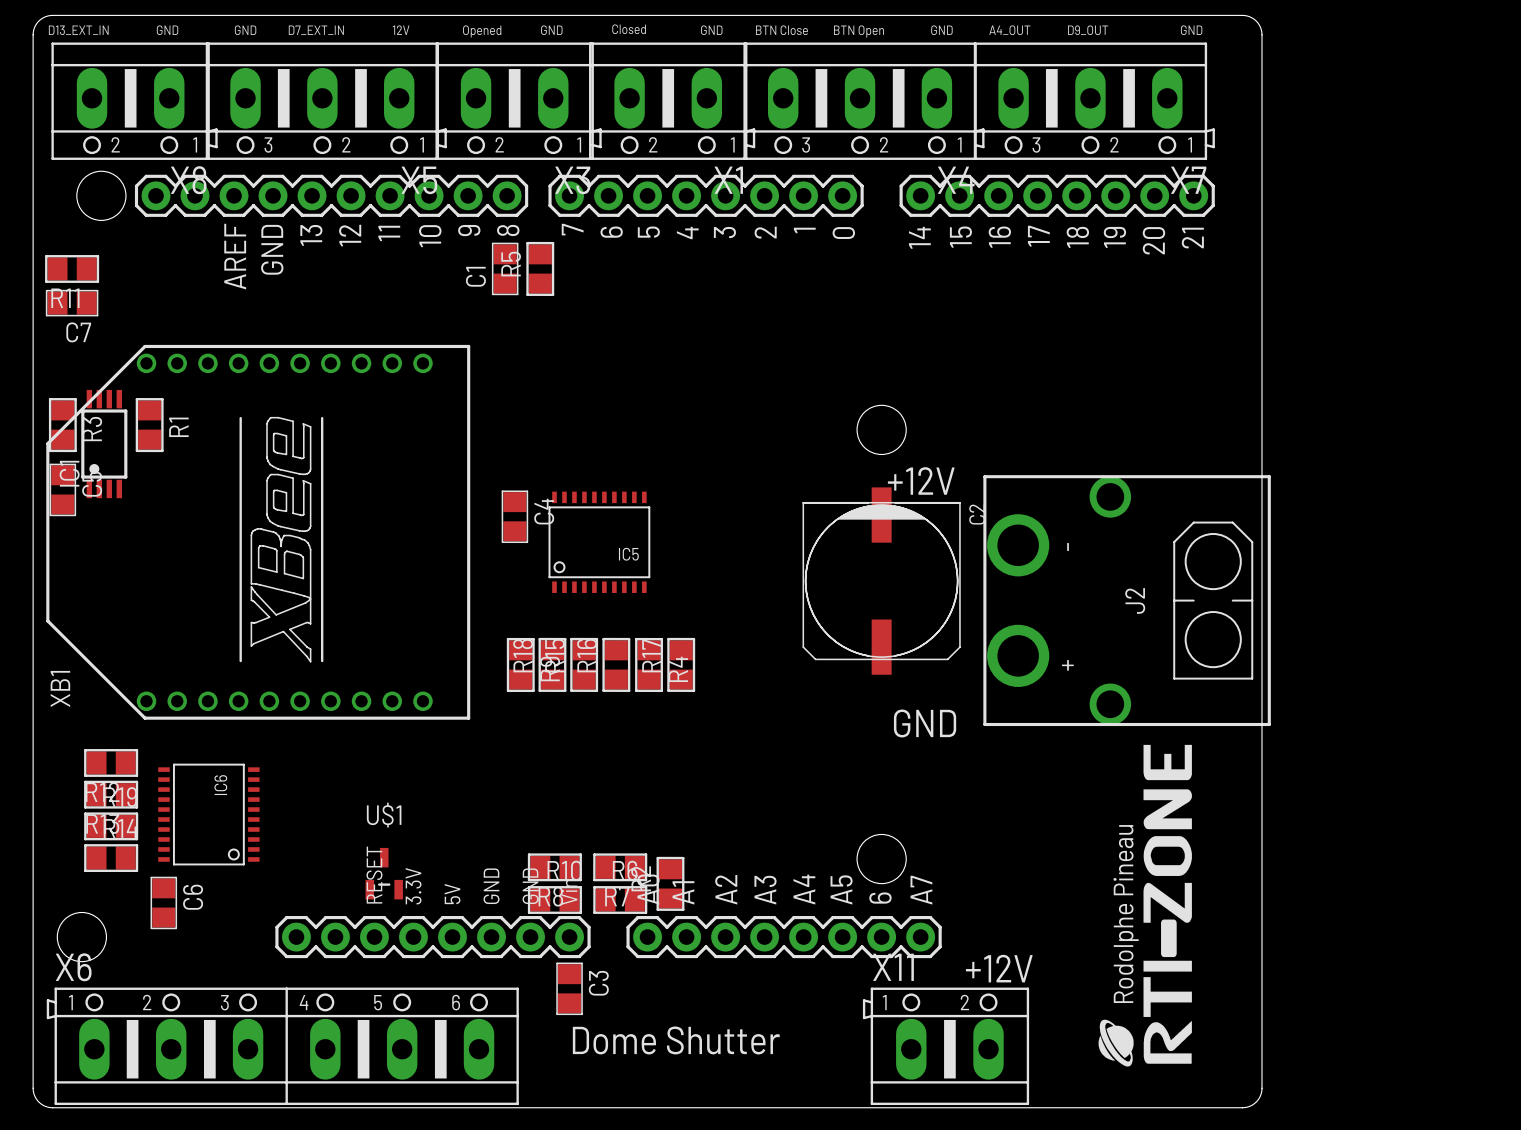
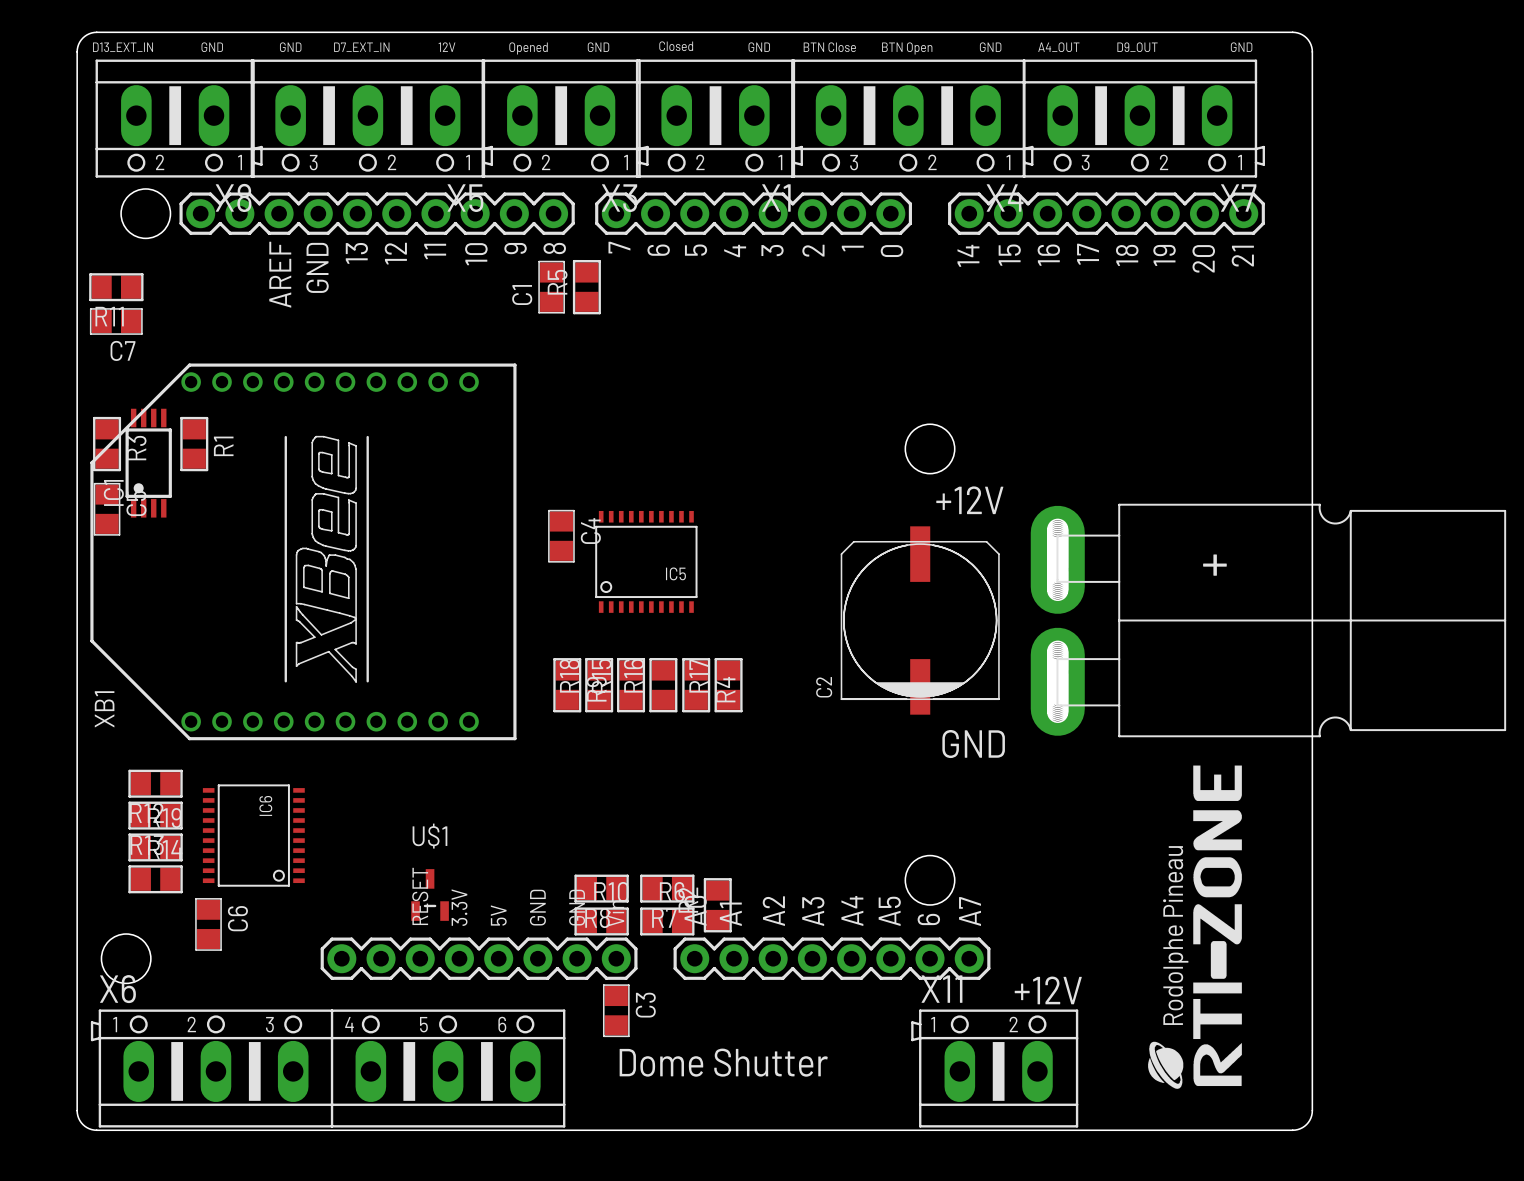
C2 rotation: 0° (881, 581) -> 180° (920, 620)
J2: (1127, 600) -> none
part: none -> (1268, 620)

